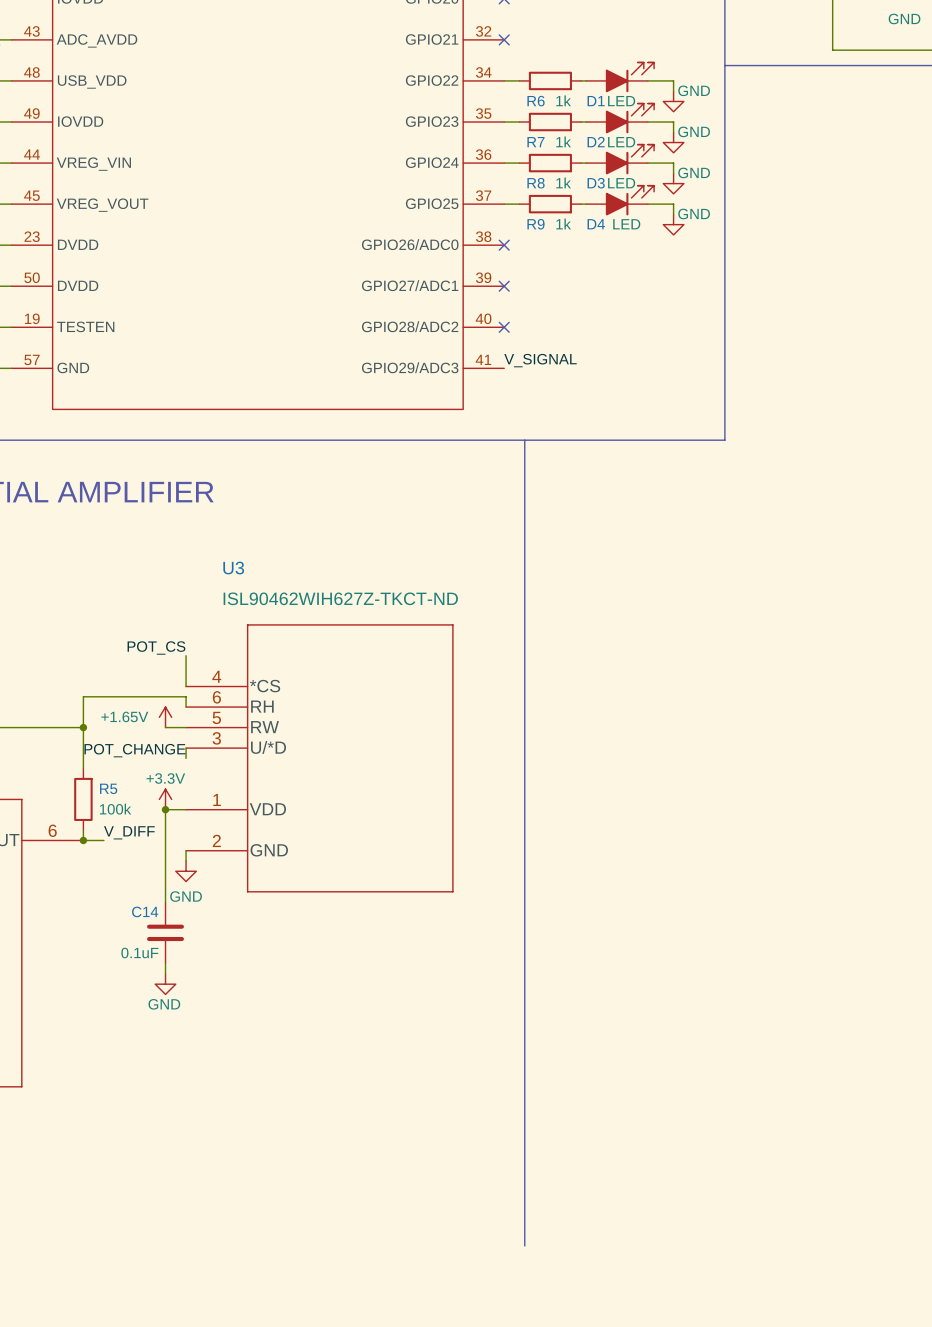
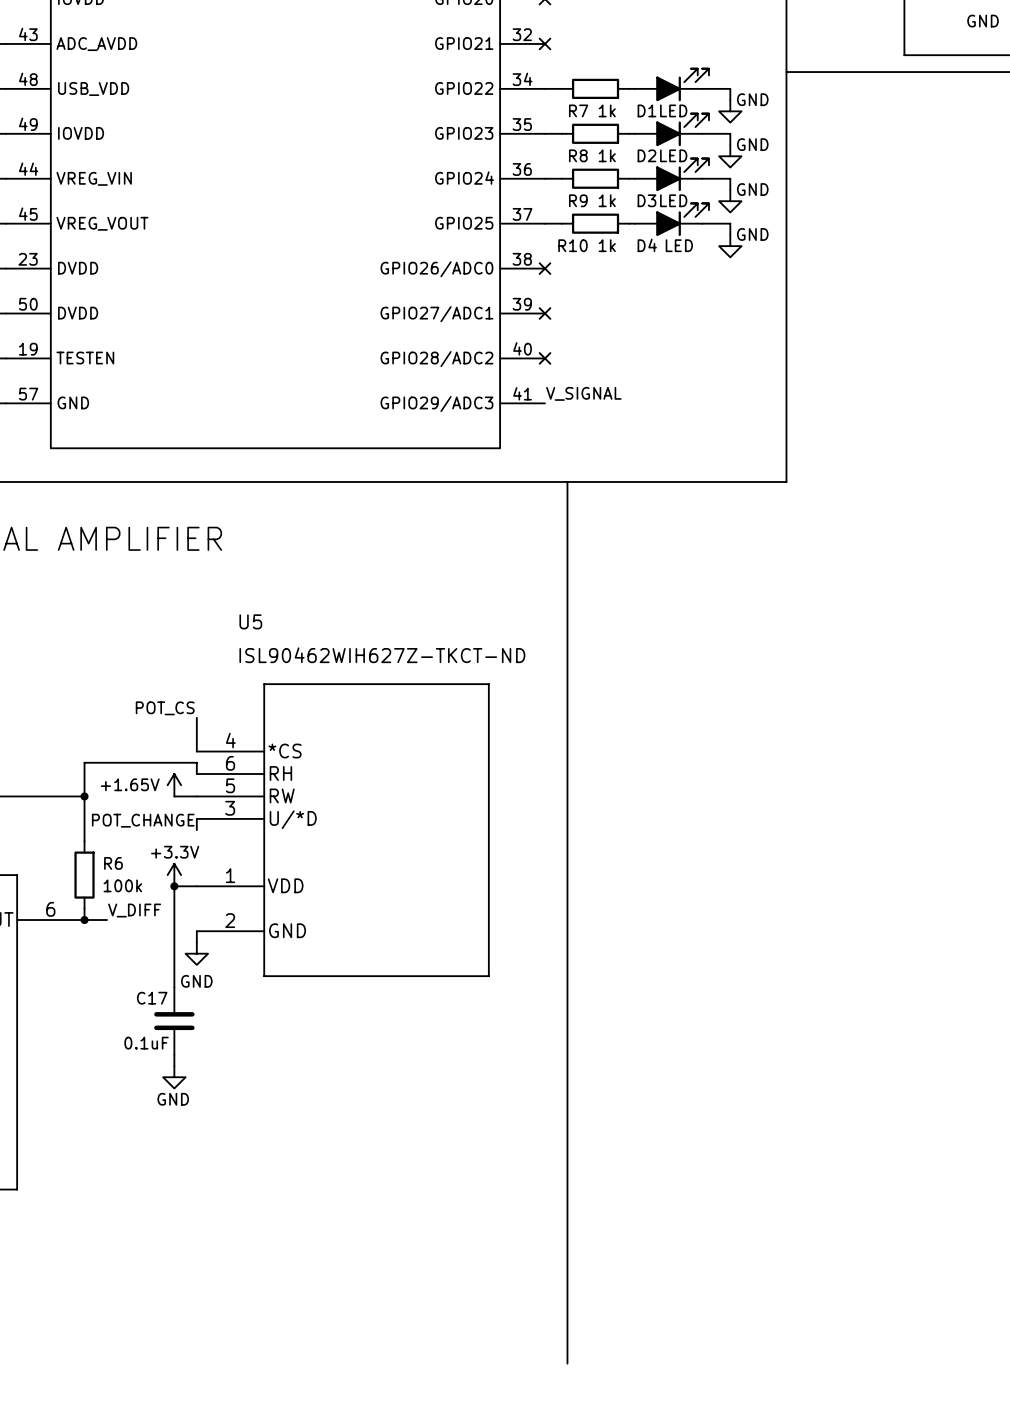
R6 name: R6 (536, 101) -> R7 (578, 110)
R7 name: R7 (535, 142) -> R8 (578, 155)
R8 name: R8 (536, 183) -> R9 (578, 200)
R9 name: R9 (536, 224) -> R10 (572, 245)
U3 name: U3 (233, 568) -> U5 (250, 621)
R5 name: R5 (108, 788) -> R6 (113, 863)
C14 name: C14 (145, 911) -> C17 (152, 998)

